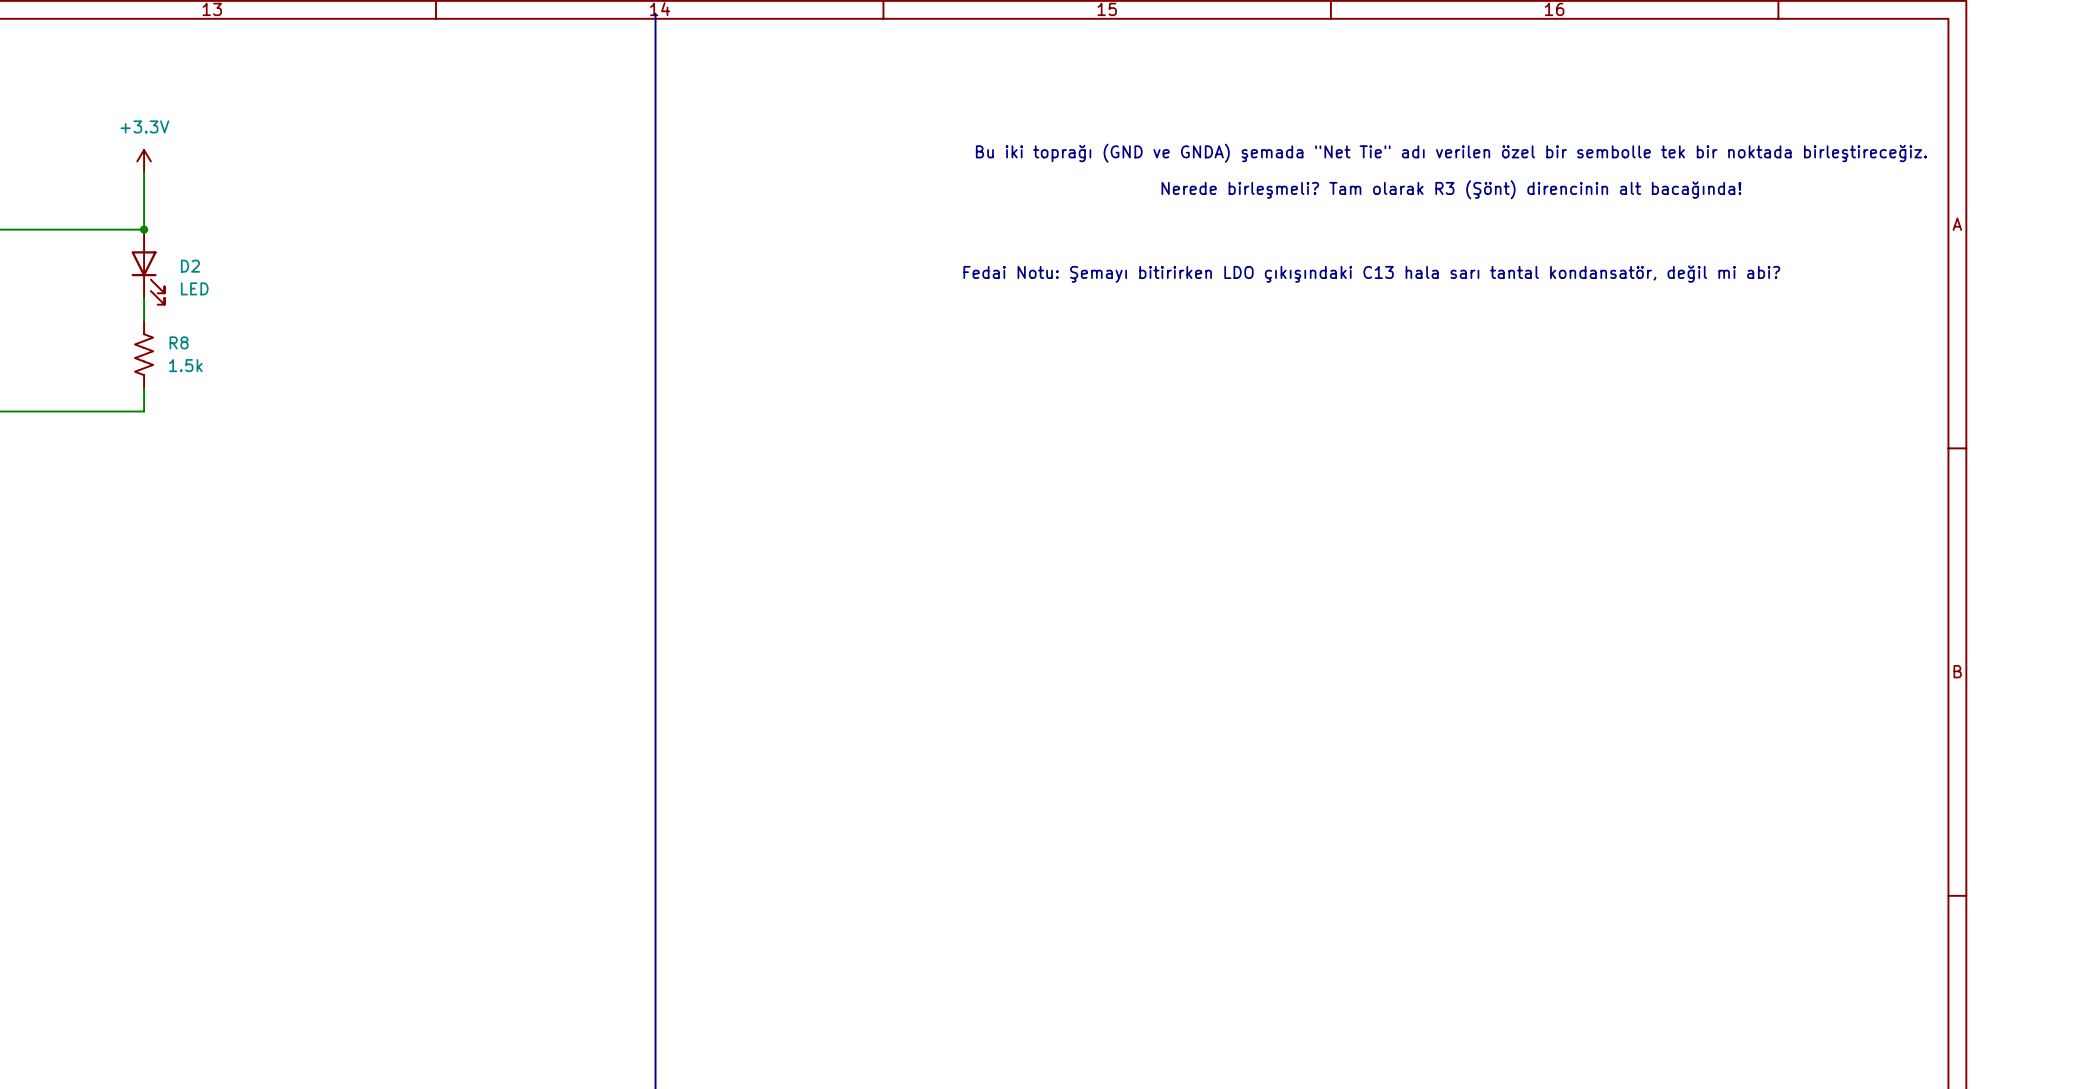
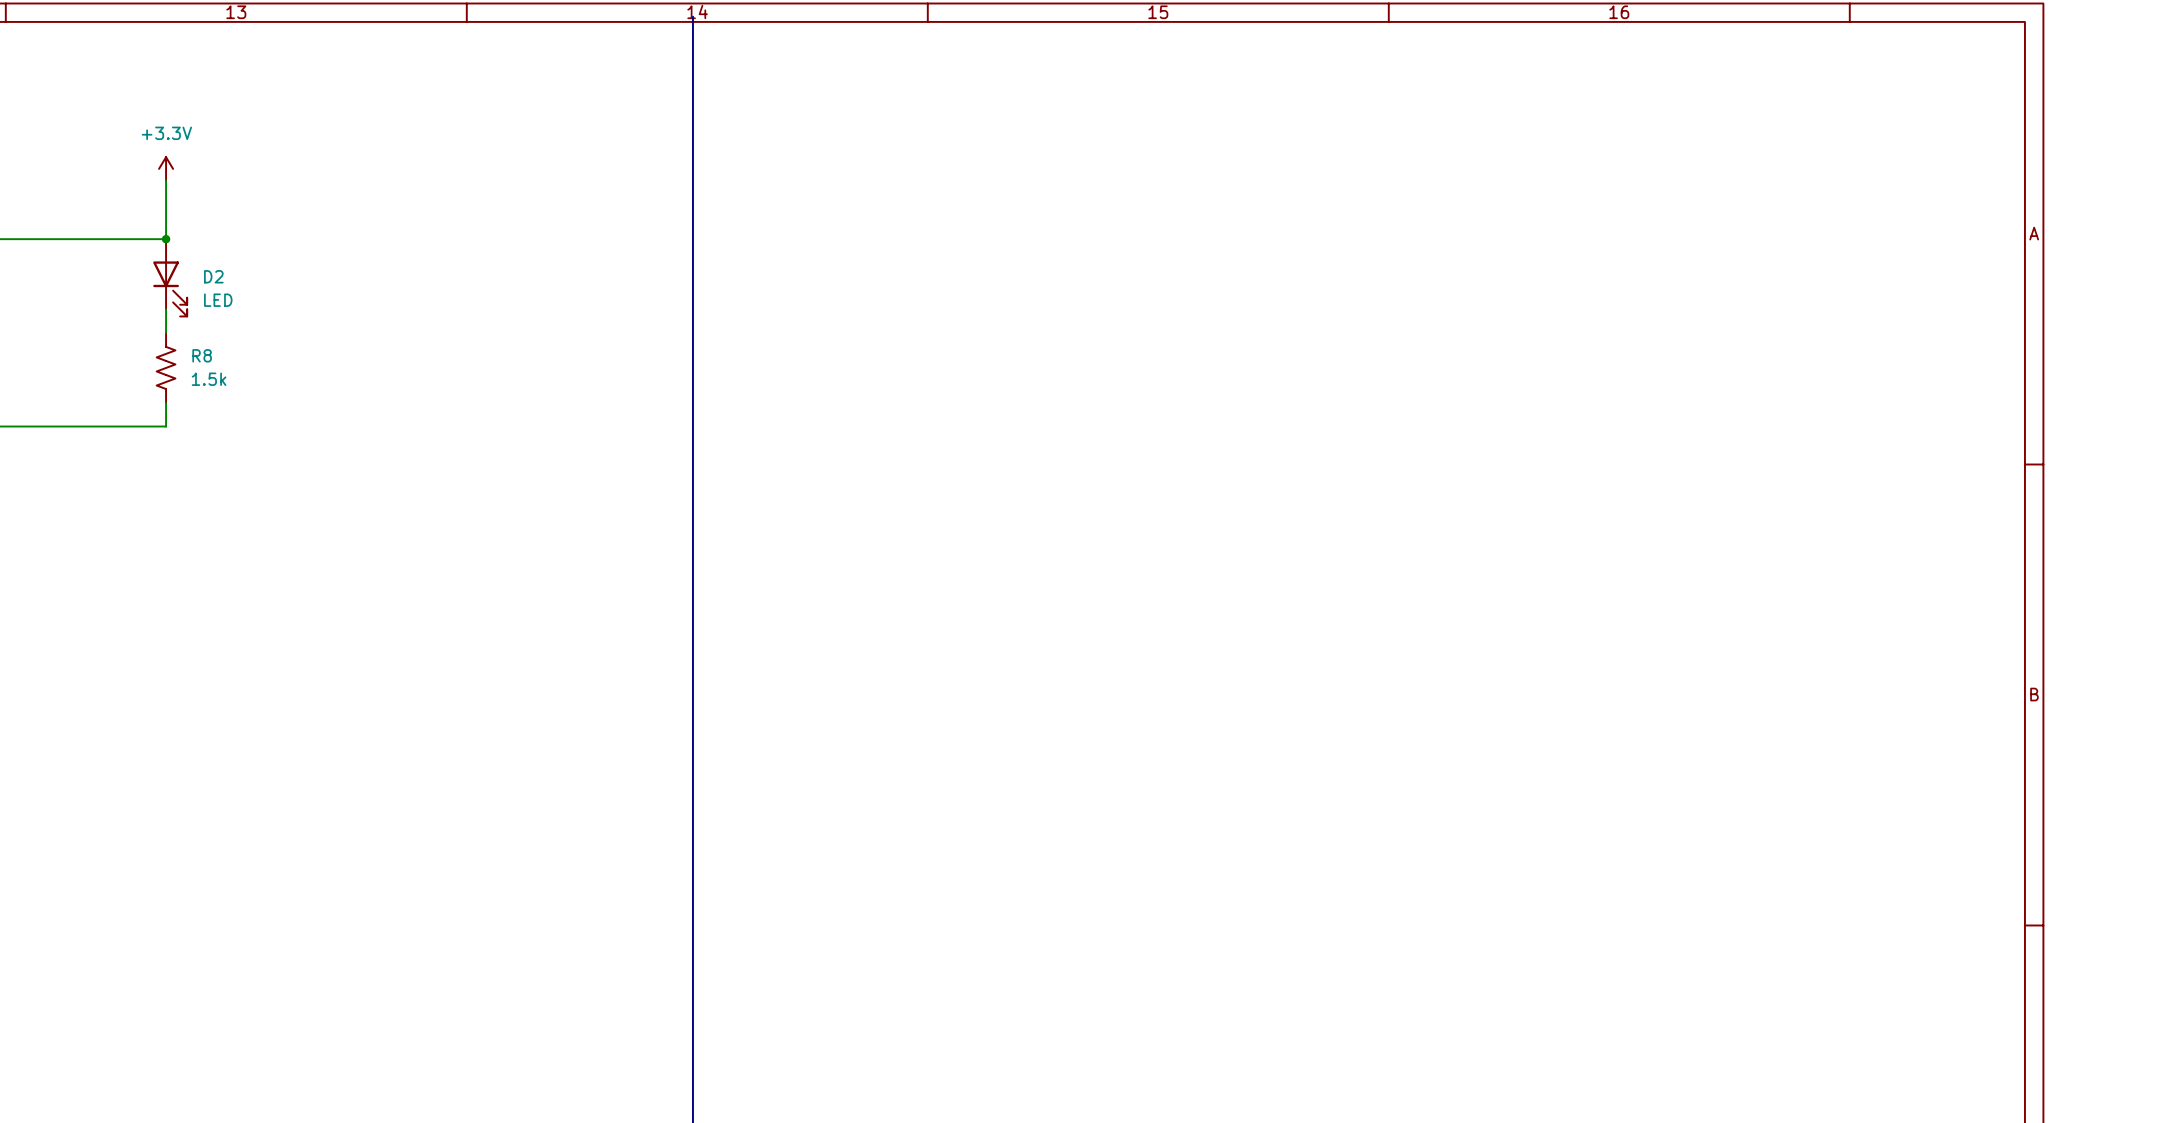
text: Bu iki toprağı (GND ve GNDA) şemada "Net Tie" adı verilen özel bir sembolle tek bir noktada birleştireceğiz. (1451, 153) -> none
text: Nerede birleşmeli? Tam olarak R3 (Şönt) direncinin alt bacağında! (1451, 189) -> none
text: Fedai Notu: Şemayı bitirirken LDO çıkışındaki C13 hala sarı tantal kondansatör, değil mi abi? (1371, 274) -> none

